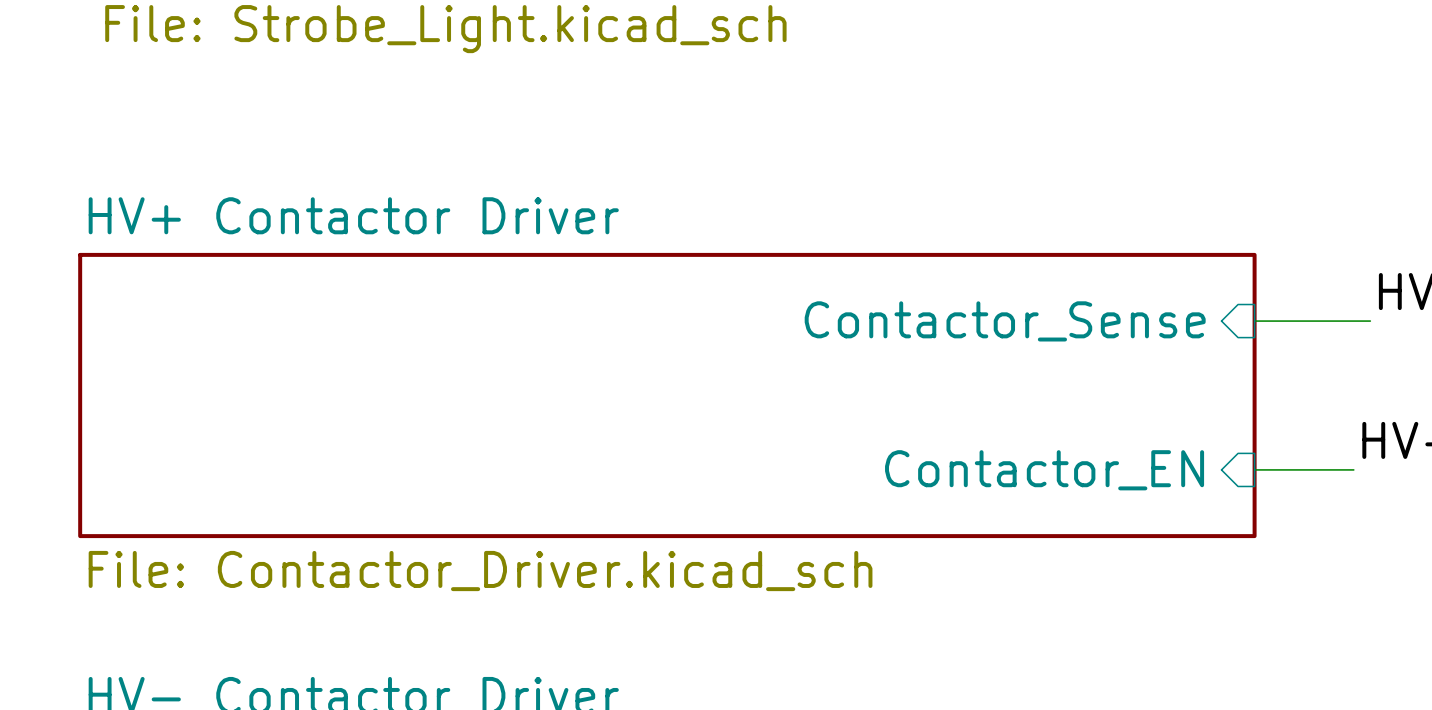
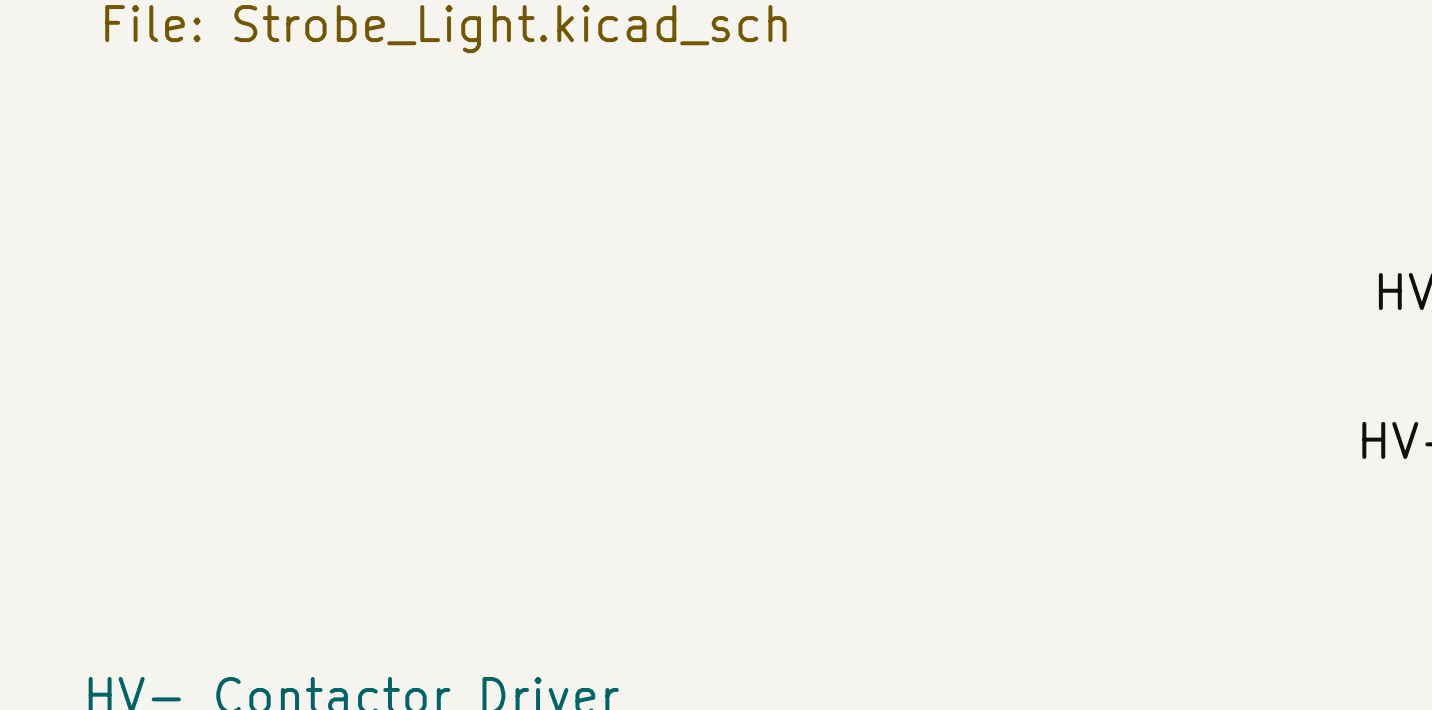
sheet pin: Contactor_Sense (1005, 321) -> none
wire: (1254, 321) (1370, 321) -> none
sheet HV+ Contactor Driver: File: Contactor_Driver.kicad_sch (667, 395) -> none
wire: (1254, 469) (1353, 469) -> none
sheet pin: Contactor_EN (1044, 470) -> none

